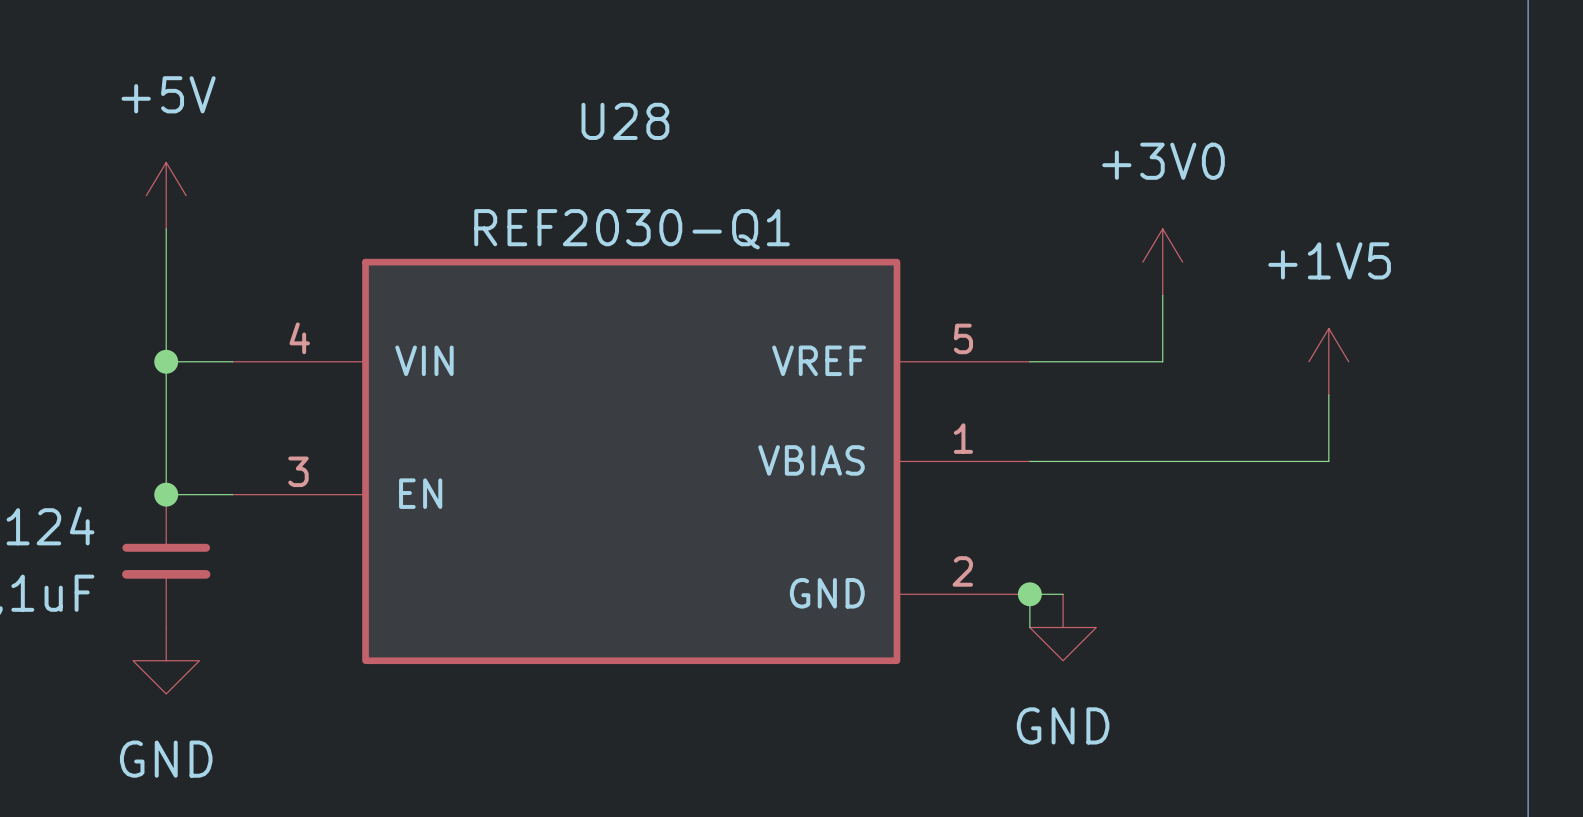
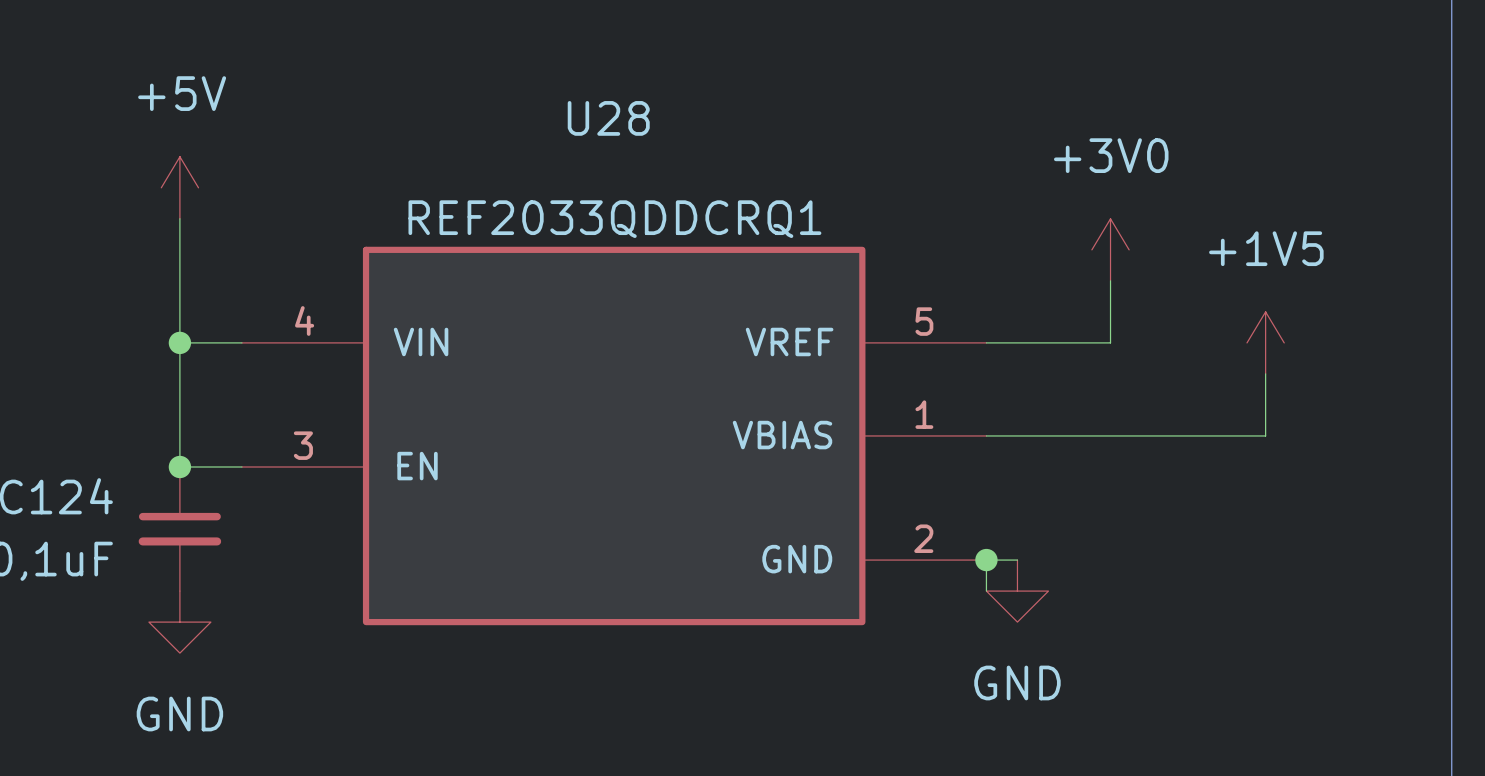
U28 value: REF2030-Q1 (632, 229) -> REF2033QDDCRQ1 (614, 219)

